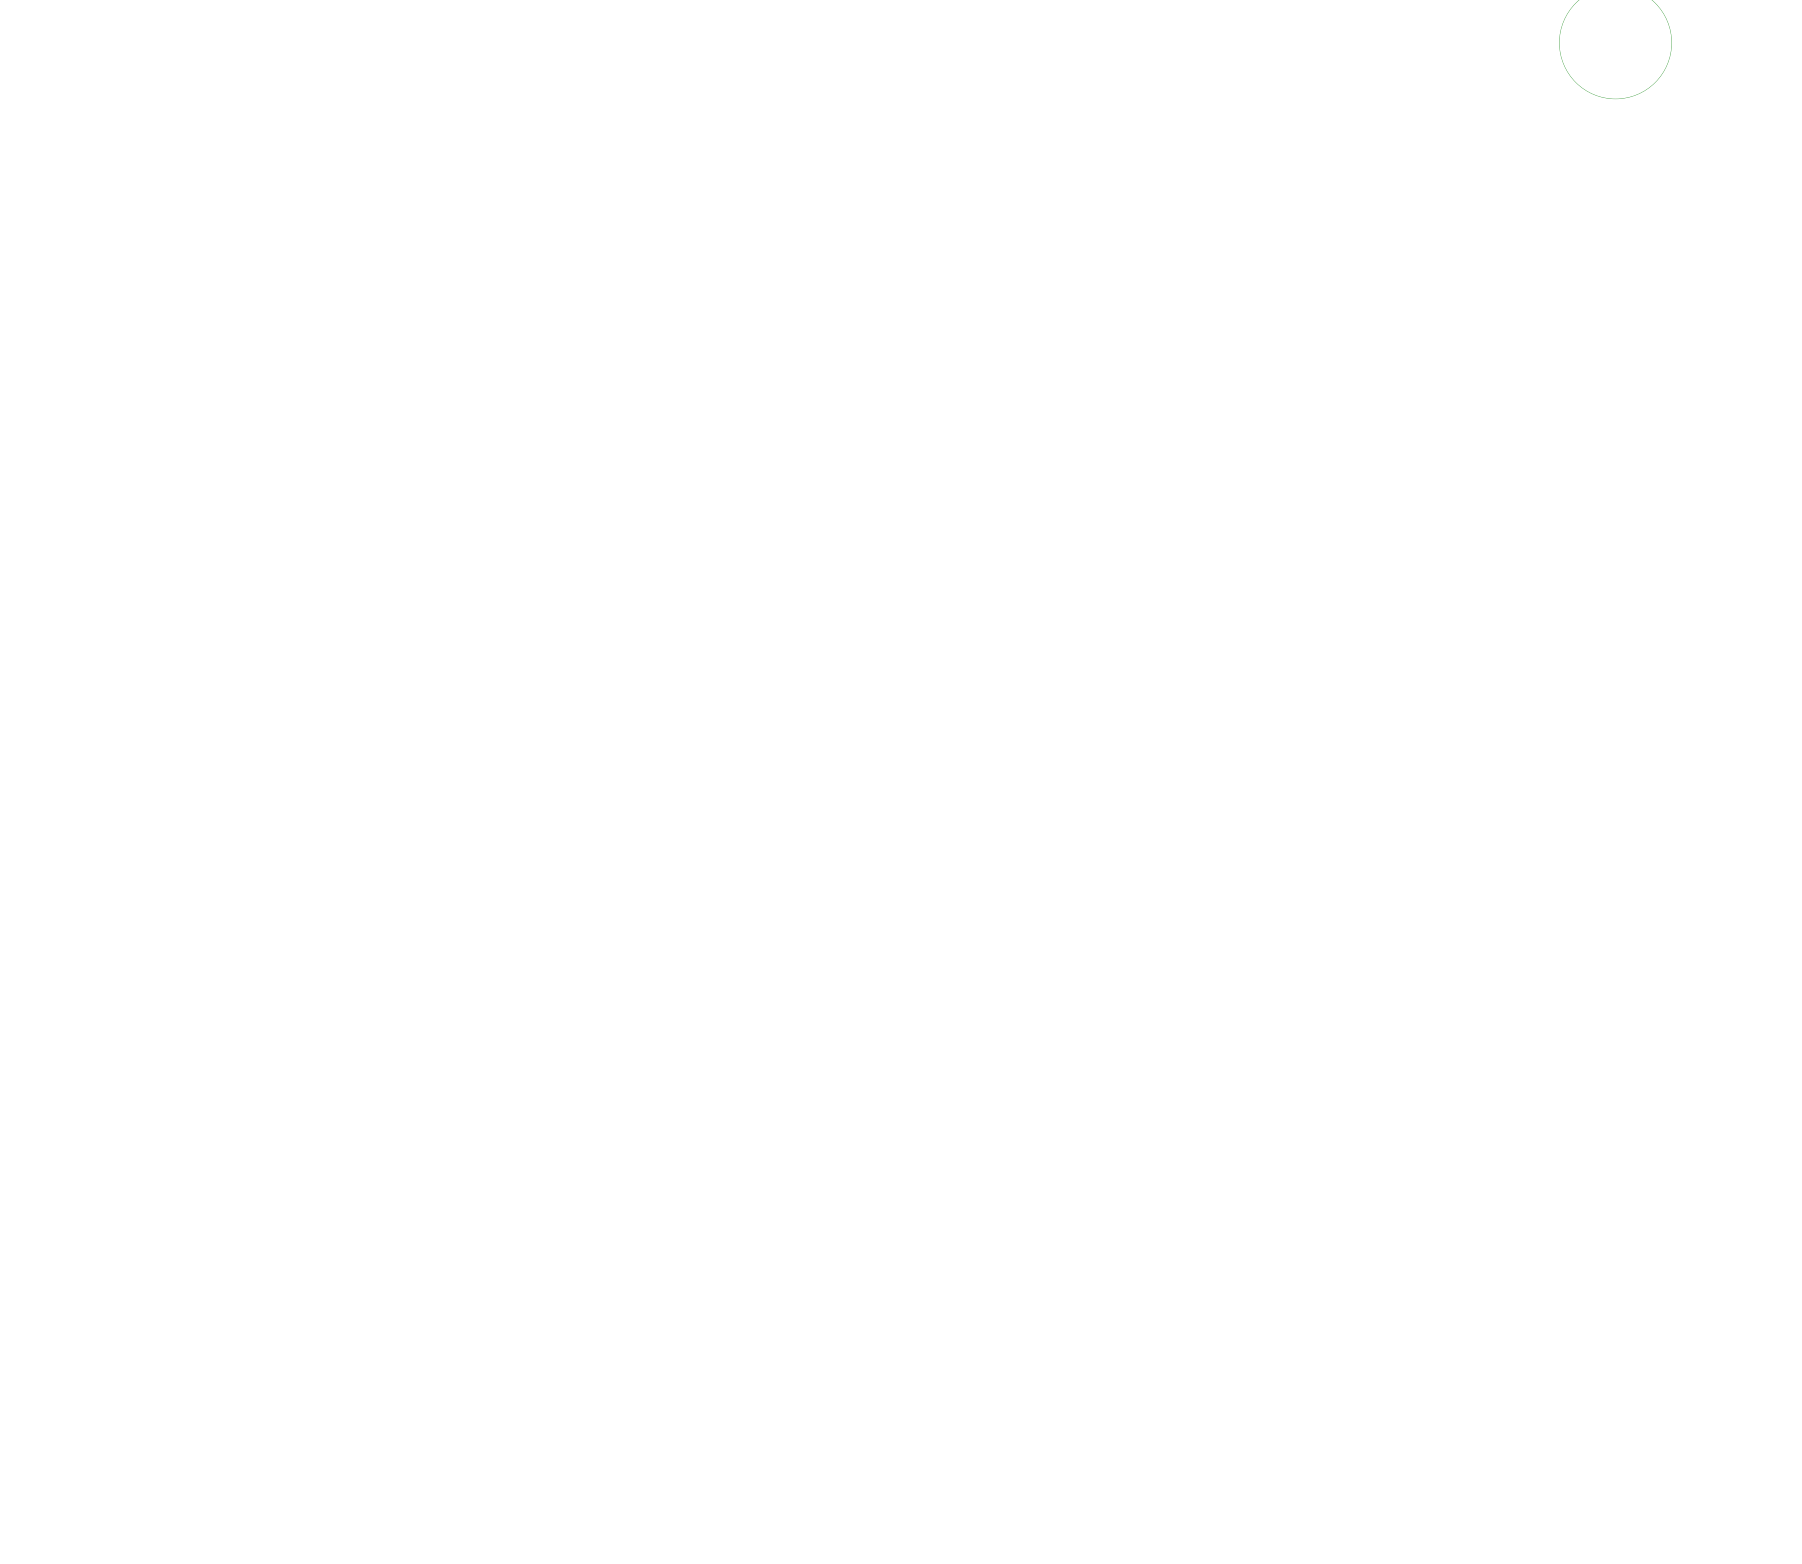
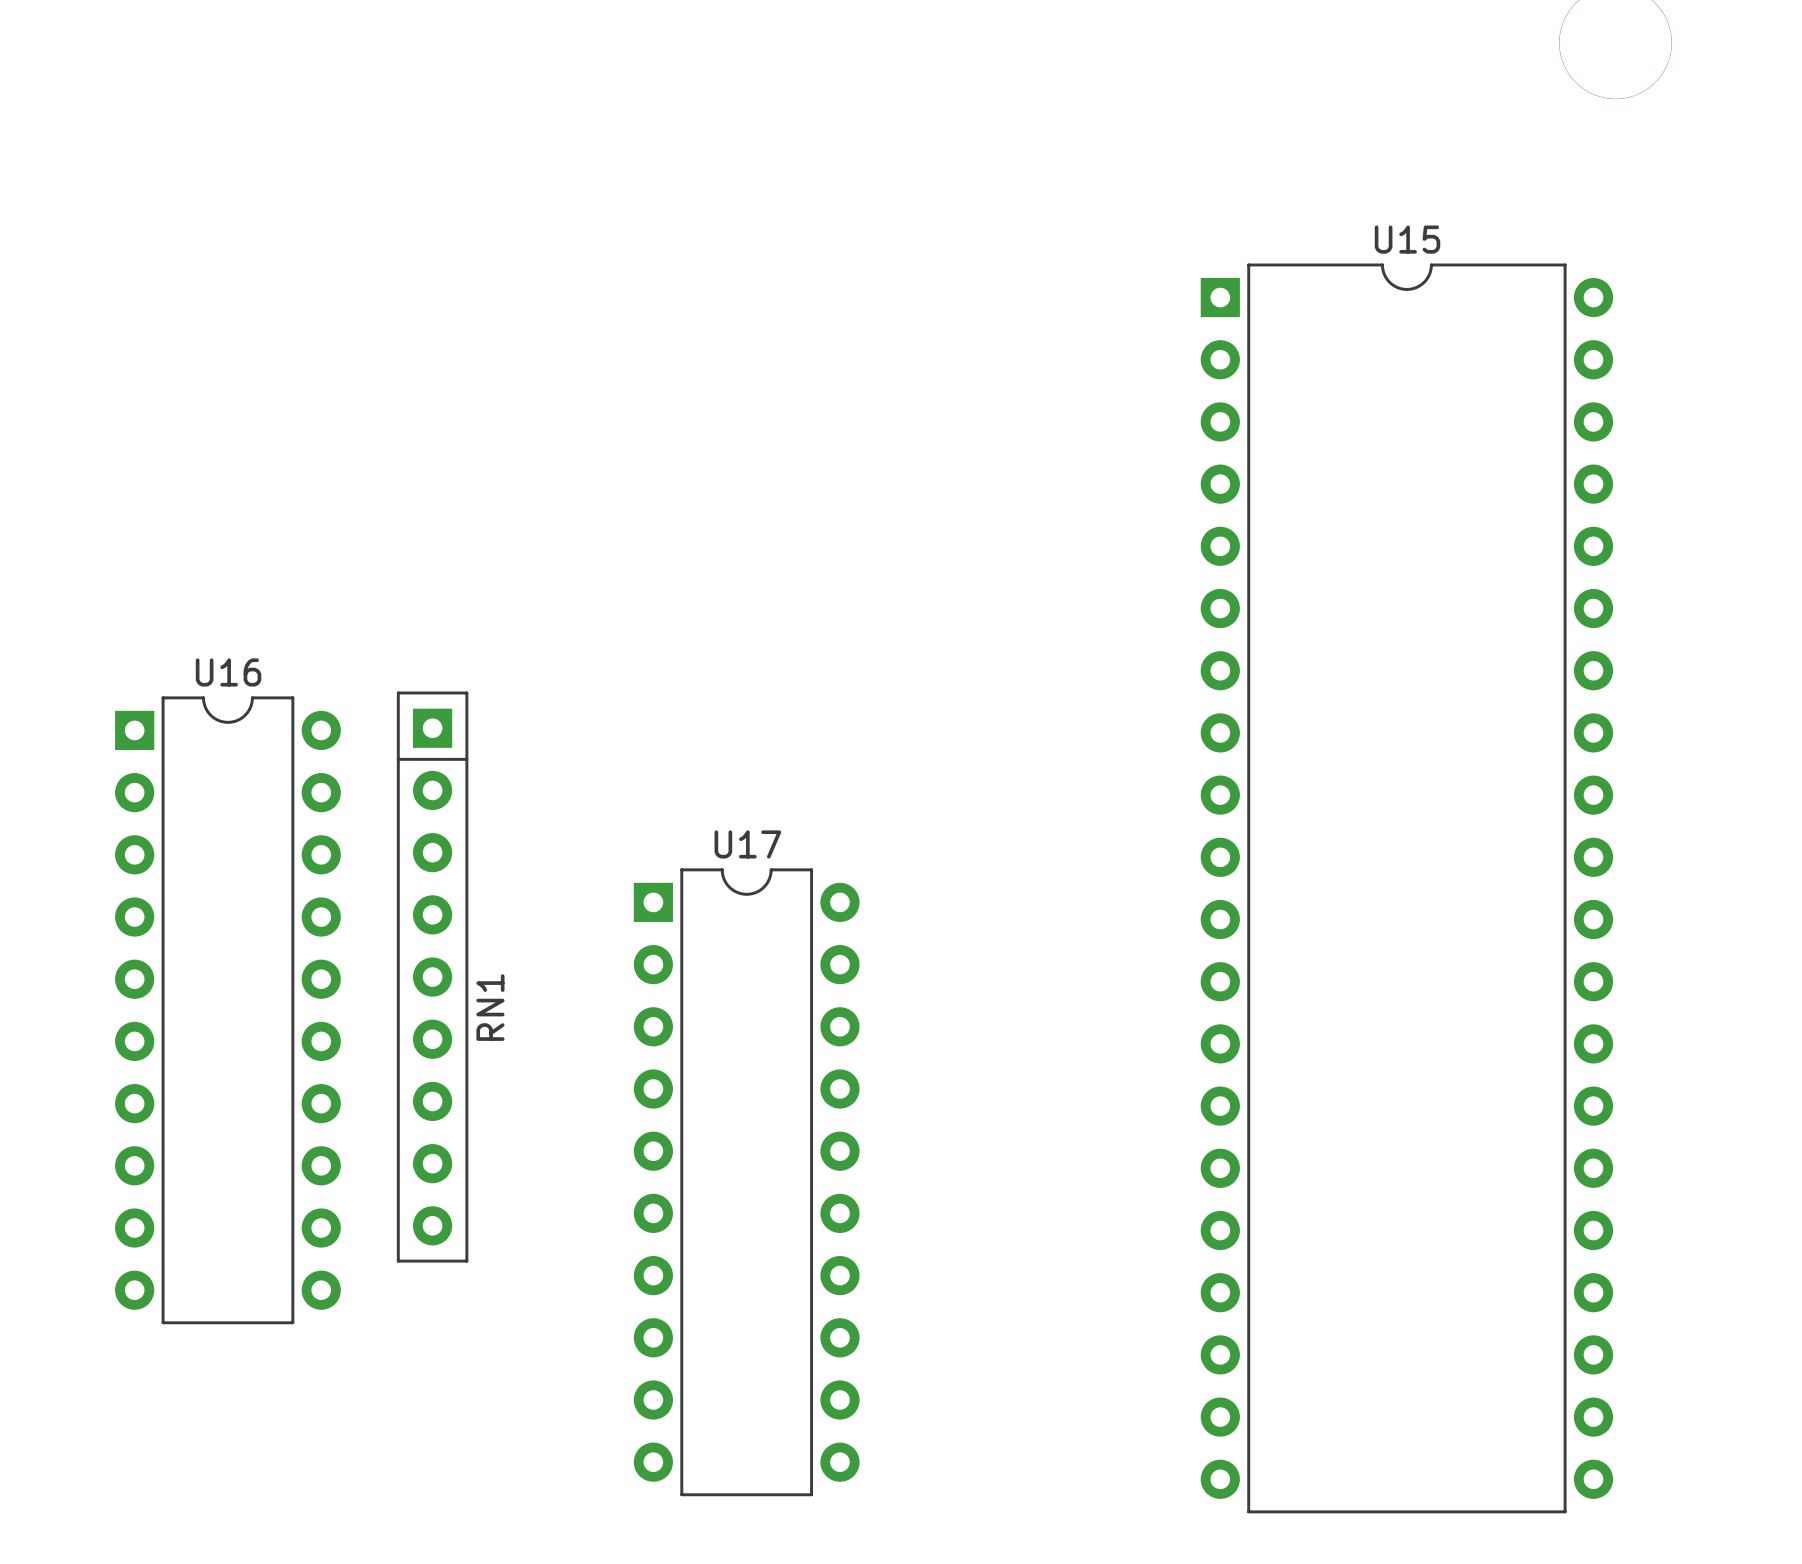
U15: none -> (1406, 888)
RN1: none -> (432, 977)
U16: none -> (227, 1010)
U17: none -> (746, 1182)

